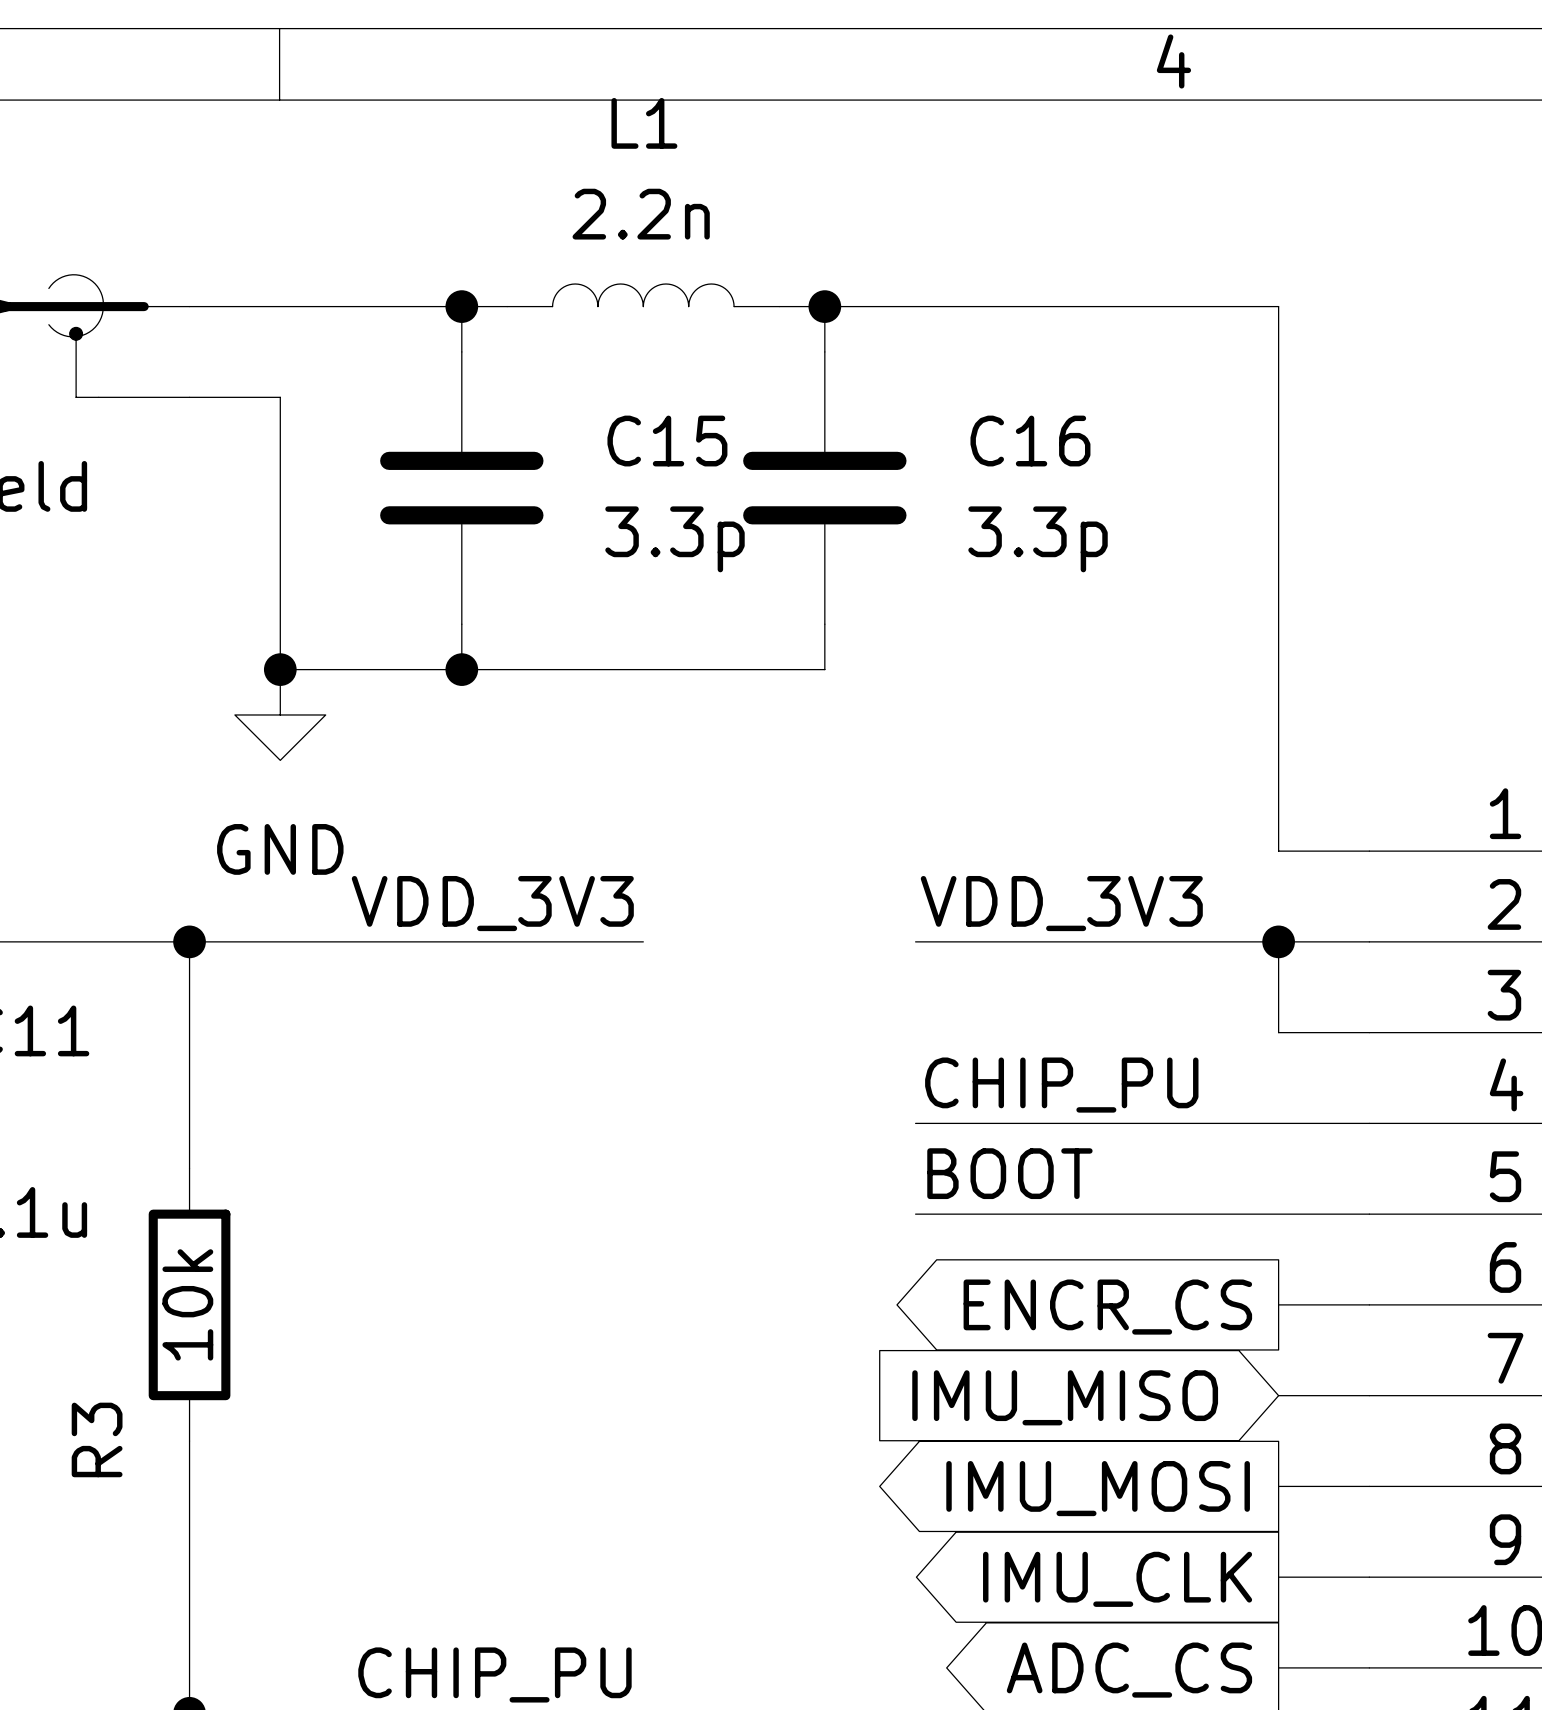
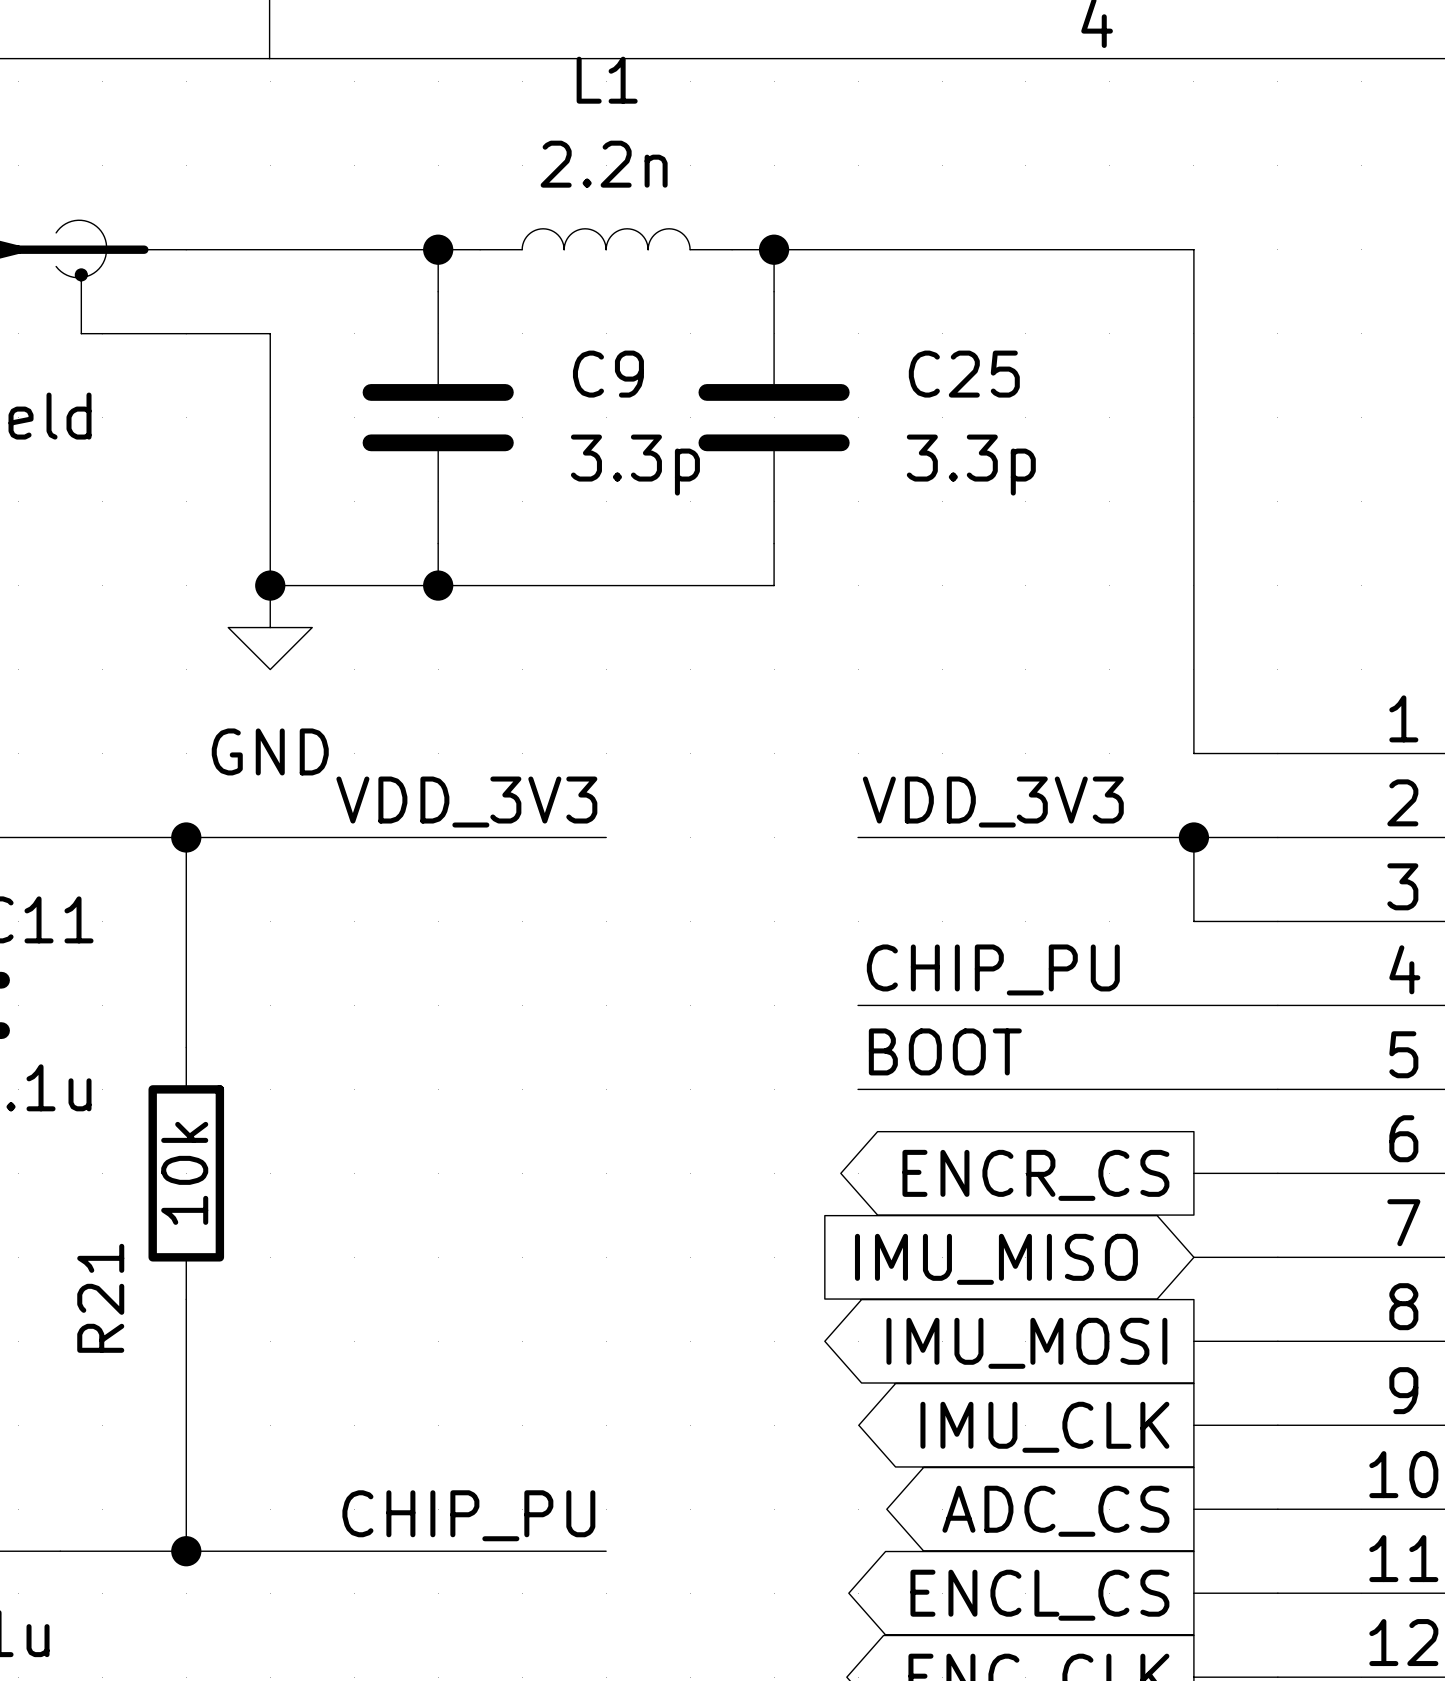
C15 name: C15 (667, 441) -> C9 (608, 374)
C16 name: C16 (1030, 441) -> C25 (964, 374)
R3 name: R3 (97, 1439) -> R21 (100, 1298)

